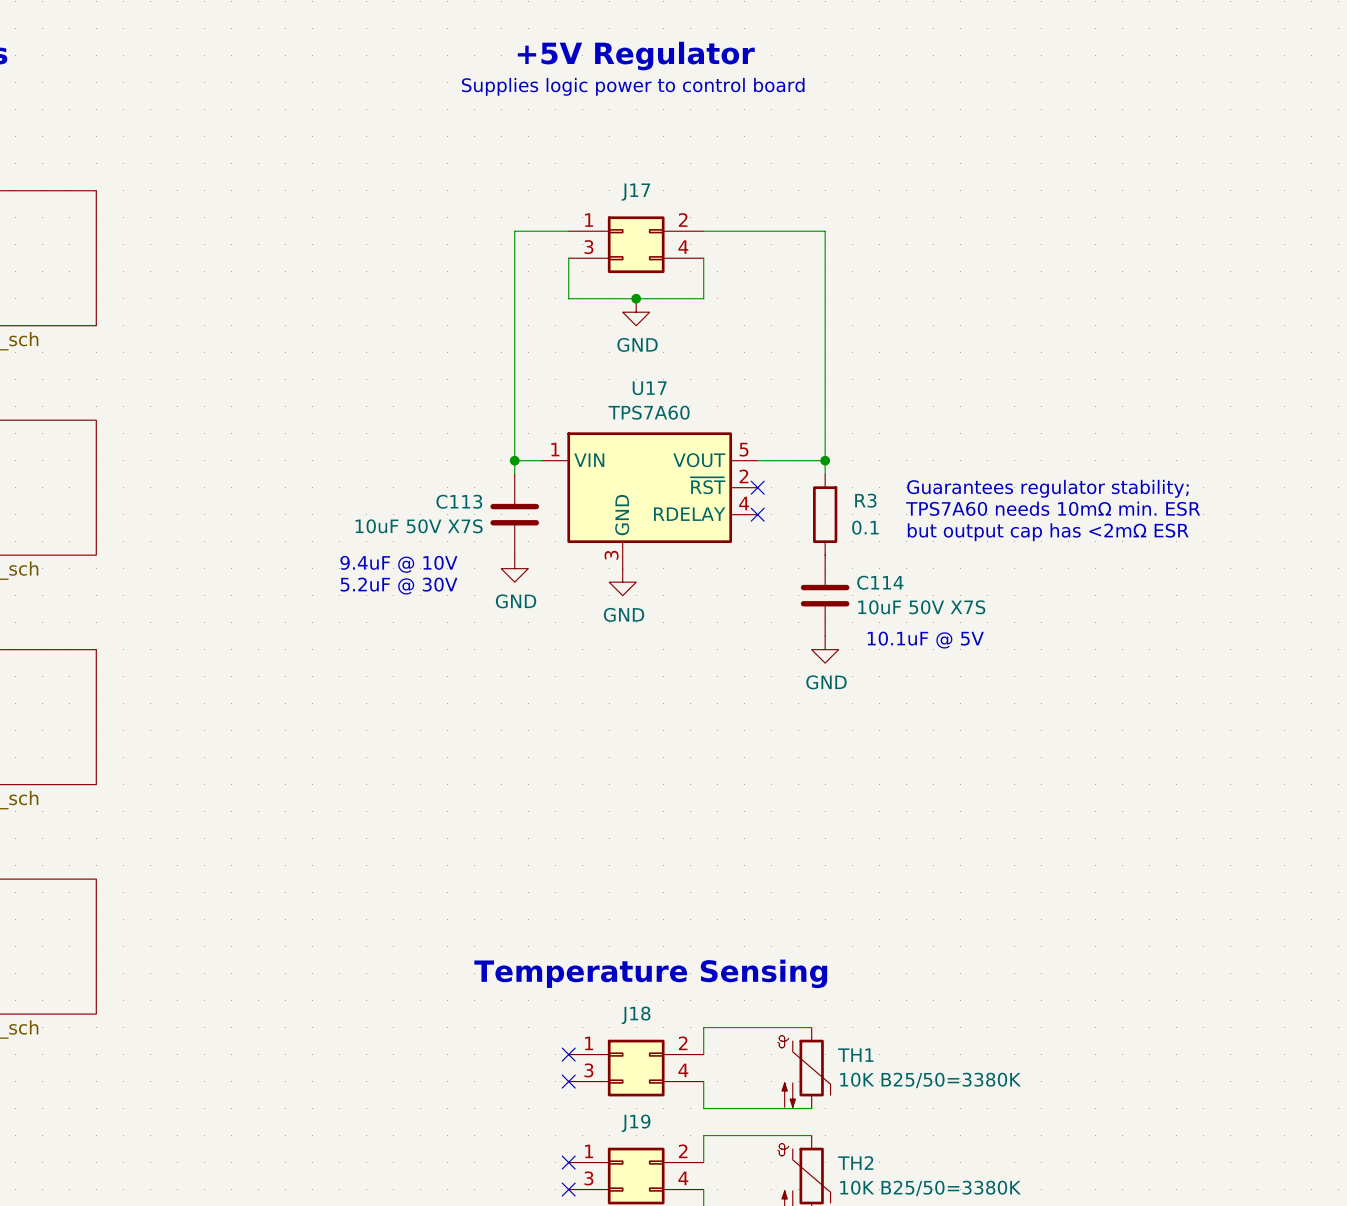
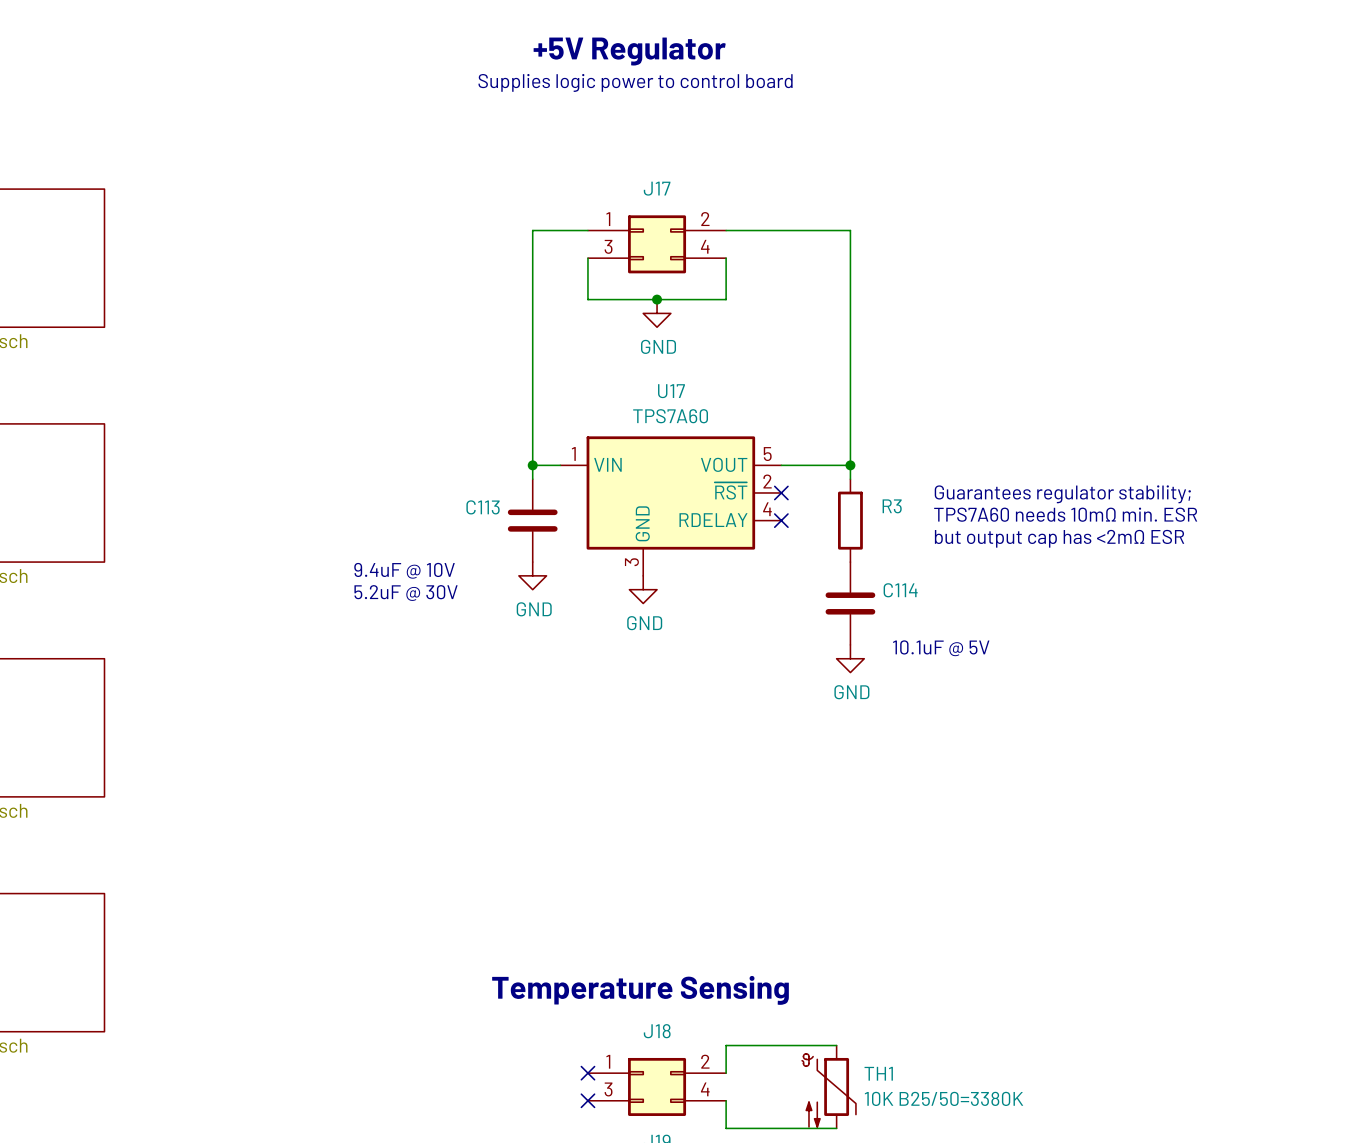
C113 value: 10uF 50V X7S (419, 526) -> none
R3 value: 0.1 (865, 527) -> none
C114 value: 10uF 50V X7S (921, 607) -> none

